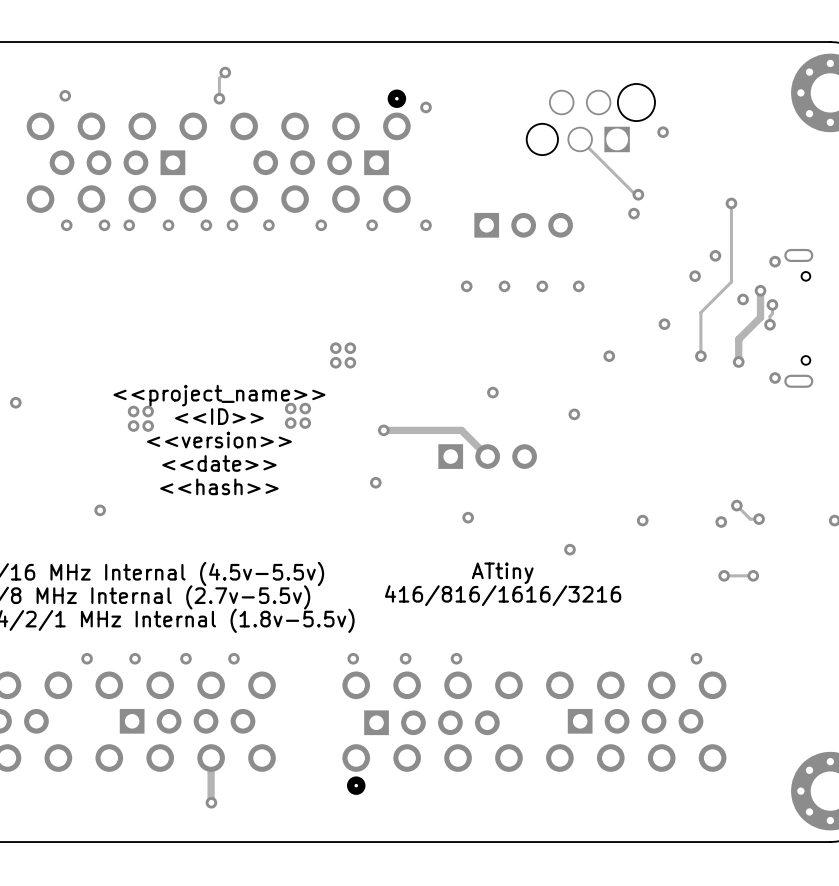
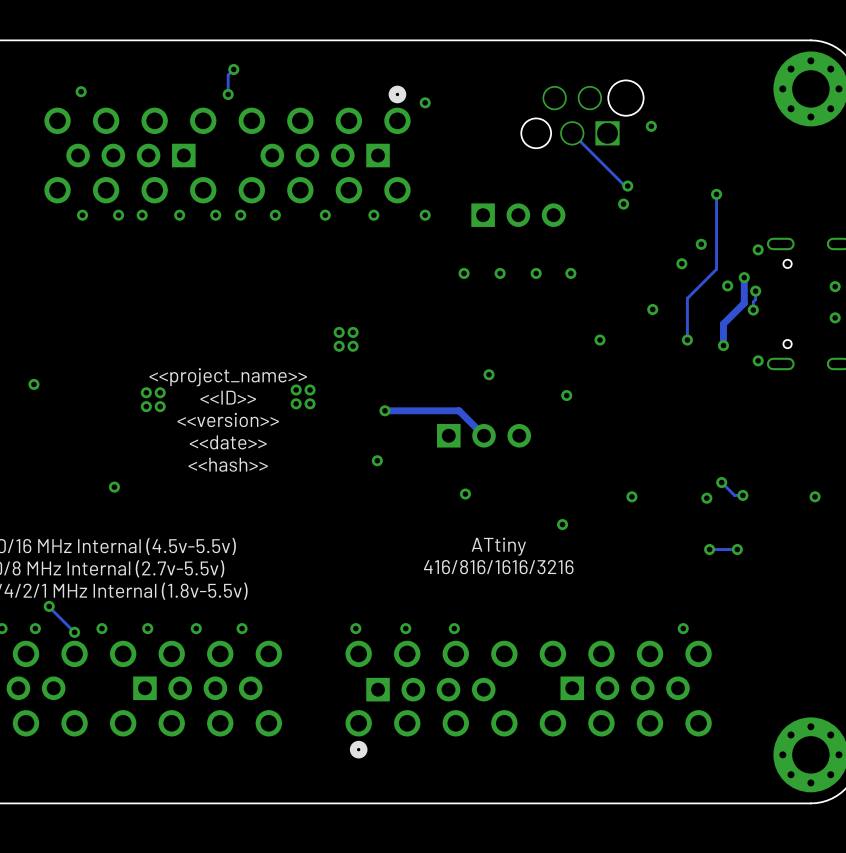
track: none -> (49, 606) (74, 632)
via: none -> (49, 606)
via: none -> (35, 628)
via: none -> (74, 632)
track: (211, 758) (212, 802) -> none
via: (211, 802) -> none

